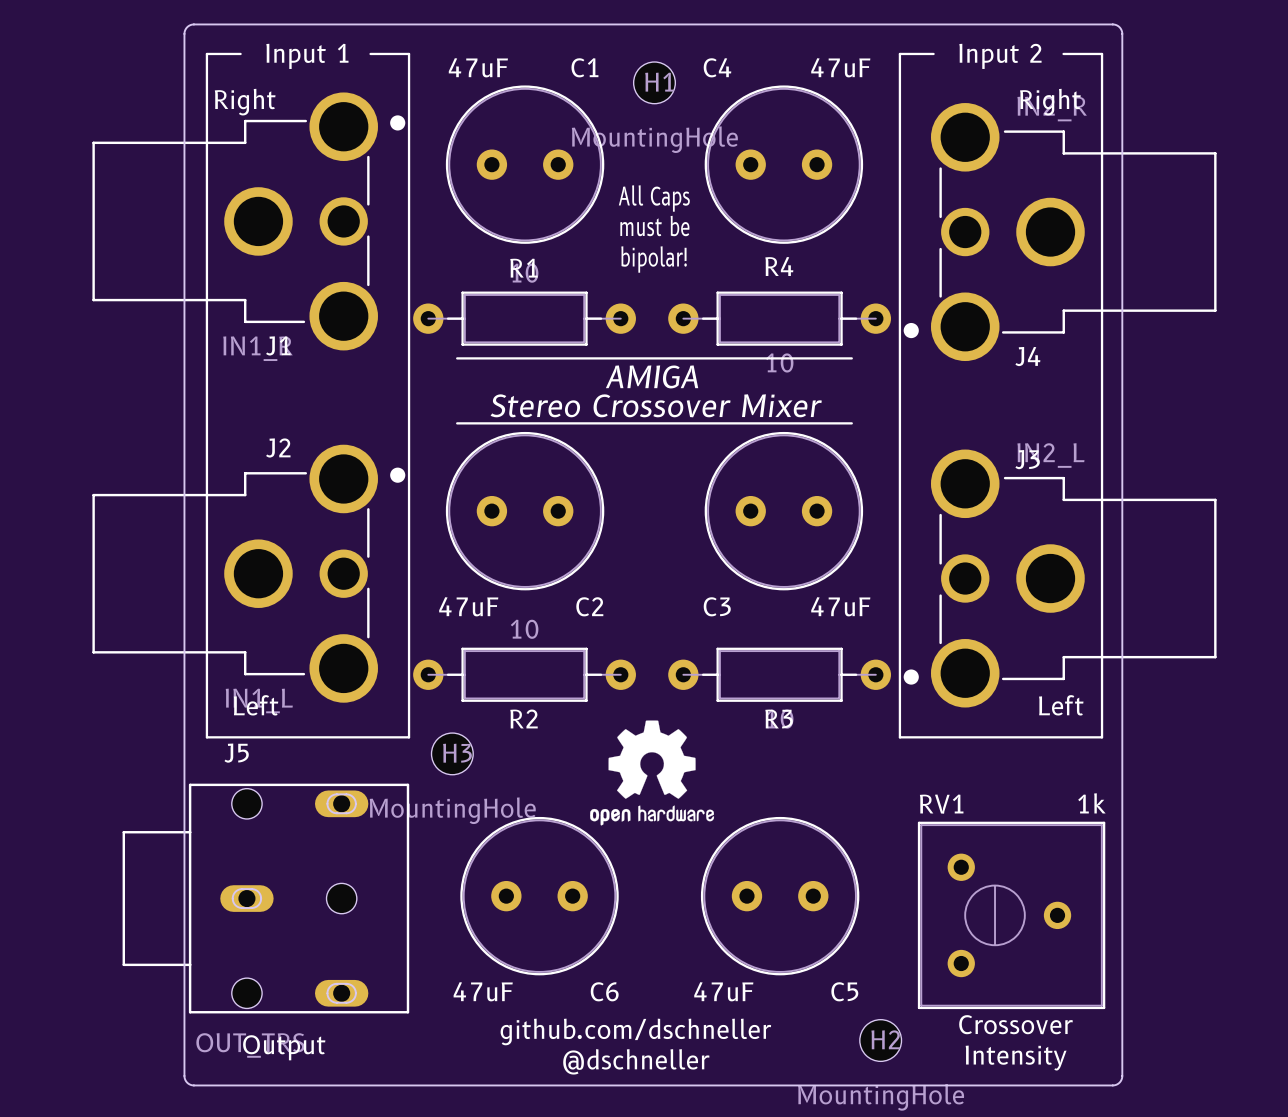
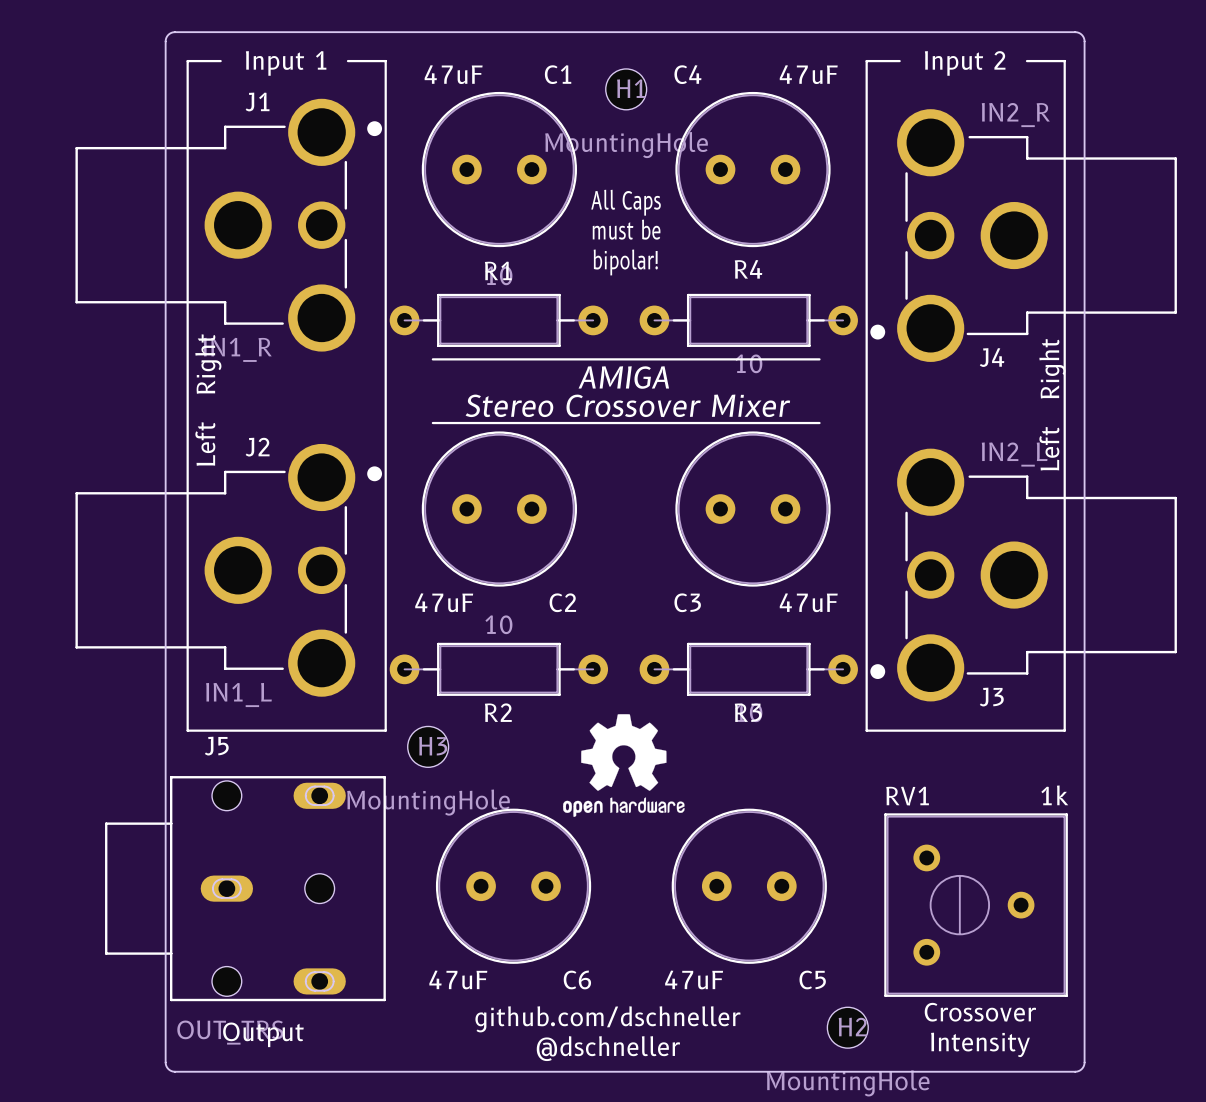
text: Right (245, 102) -> none
text: Right (1050, 102) -> none
J1 name position: J1 (278, 345) -> J1 (257, 102)
text: none -> Left Right (208, 400)
text: none -> Left Right (1052, 404)
J3 name position: J3 (1027, 459) -> J3 (991, 697)
text: Left (256, 705) -> none
text: Left (1061, 705) -> none

